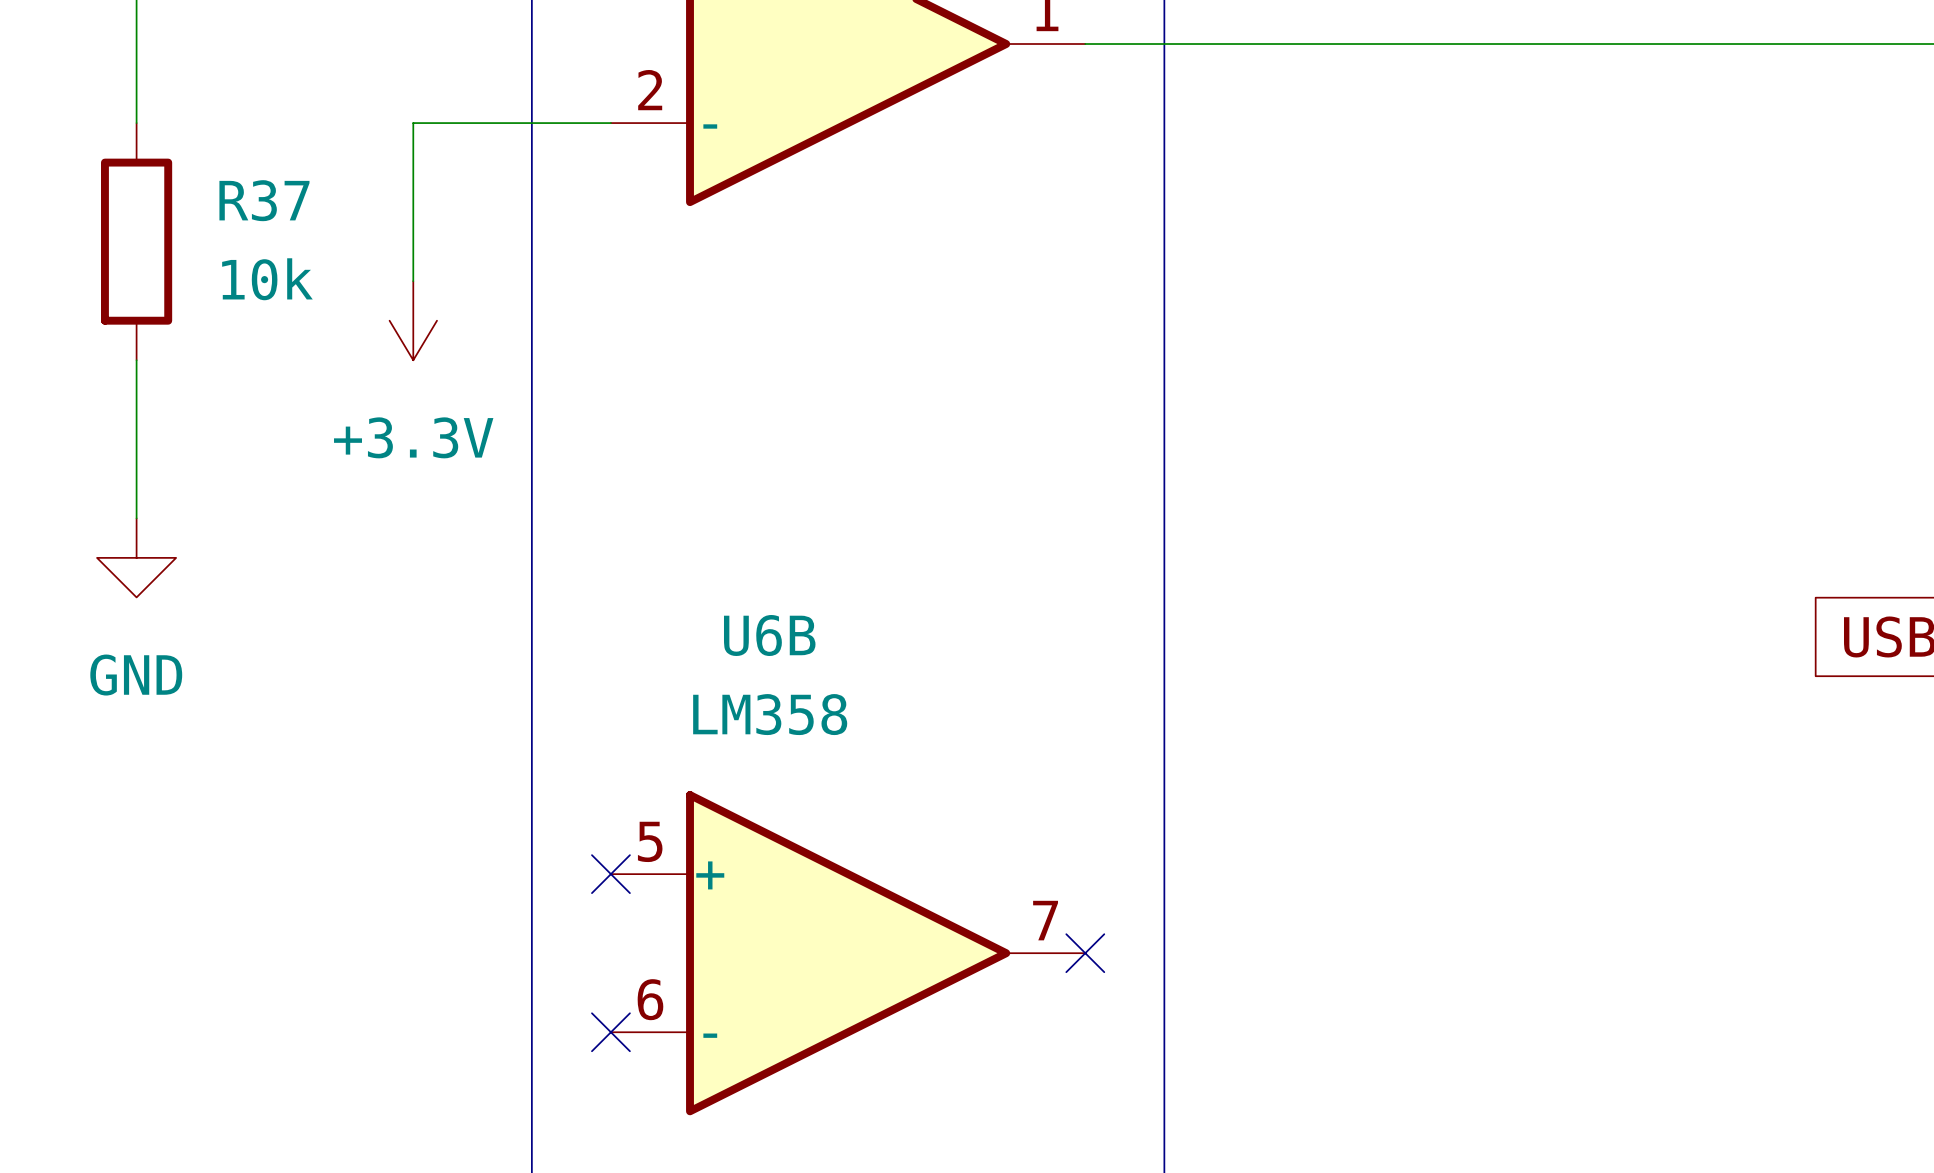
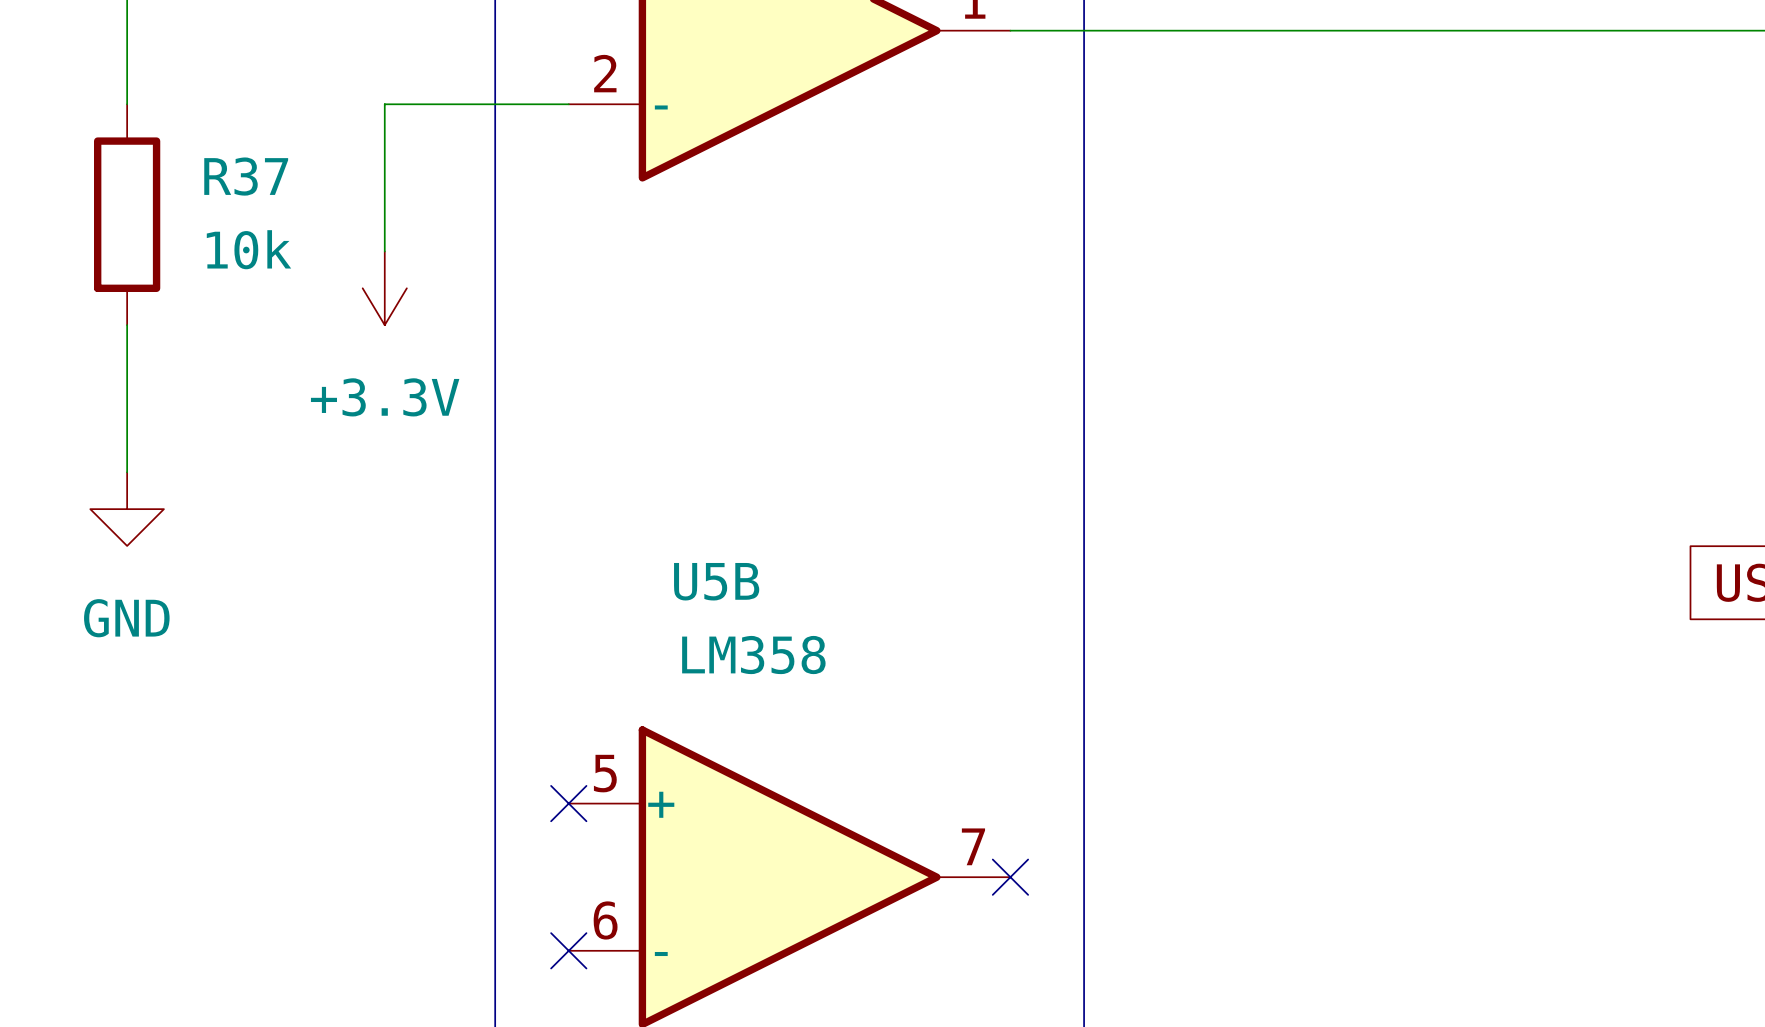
U6B name: U6B (769, 635) -> U5B (716, 581)
U6B value position: LM358 (770, 714) -> LM358 (753, 655)

